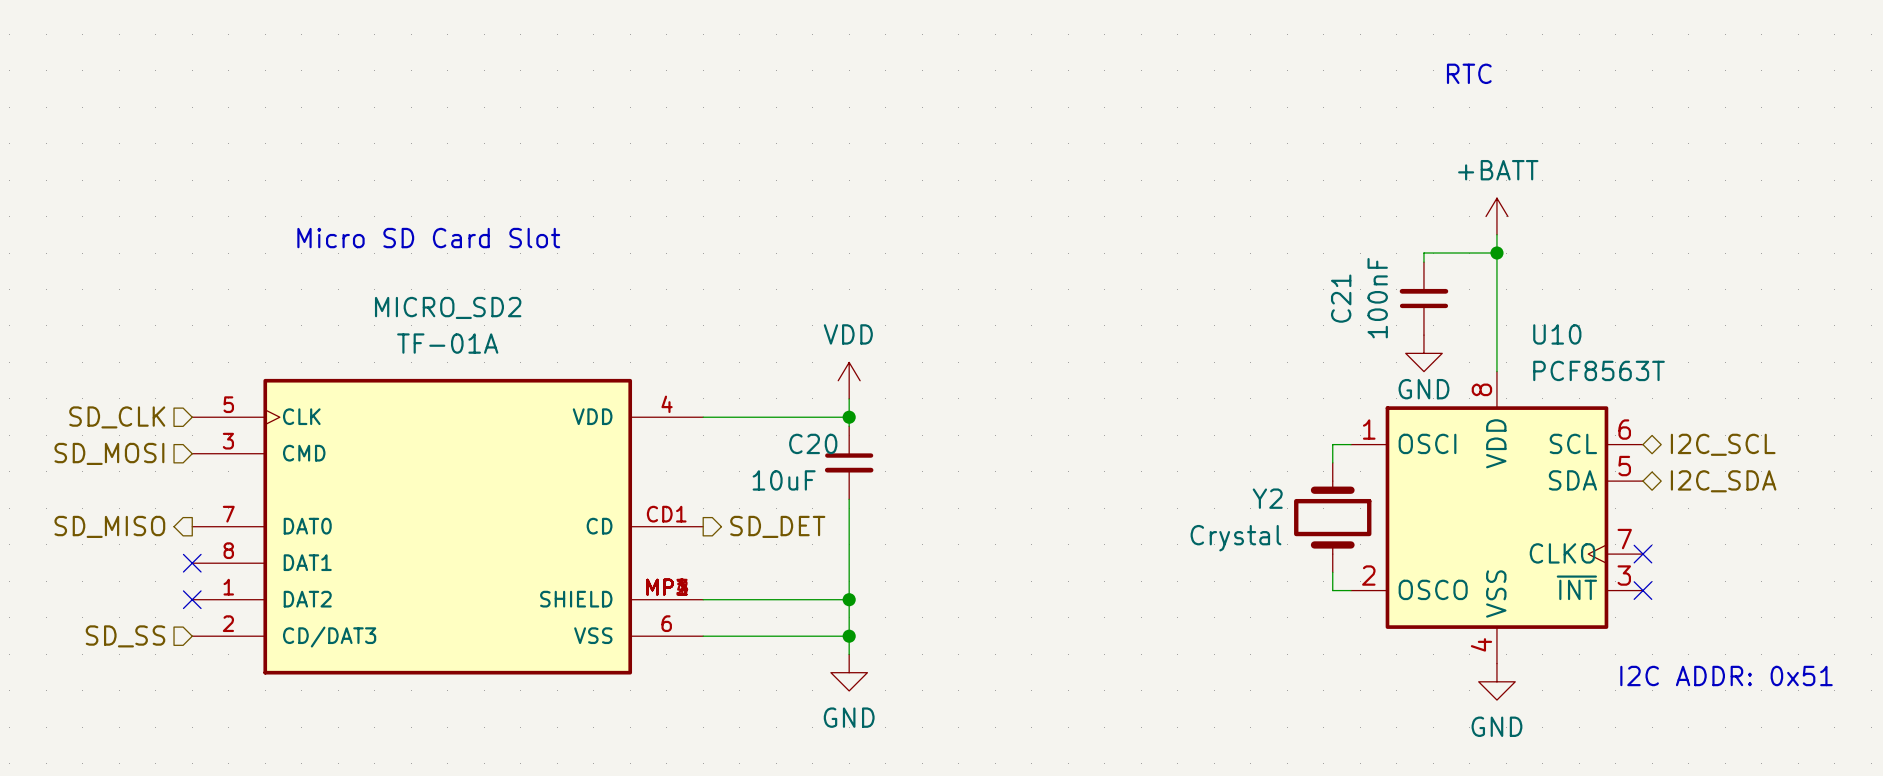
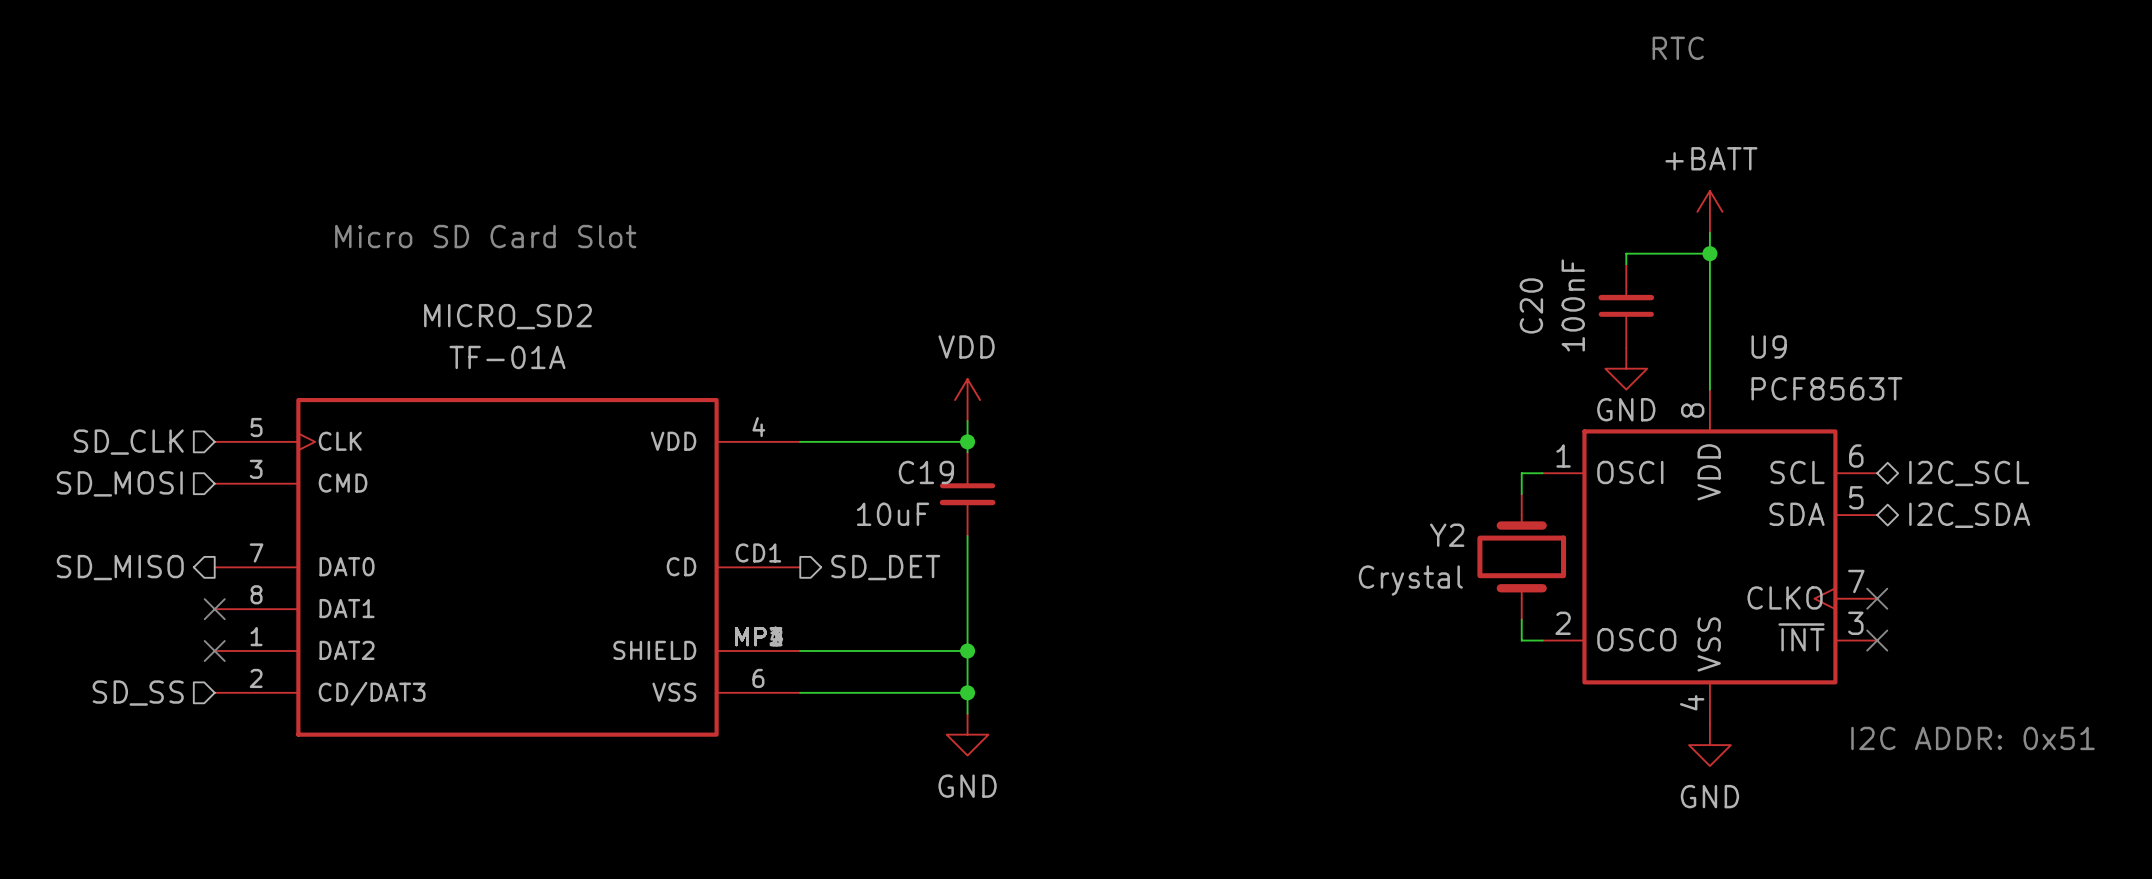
C21 name: C21 (1341, 298) -> C20 (1531, 305)
U10 name: U10 (1557, 334) -> U9 (1769, 346)
C20 name: C20 (813, 443) -> C19 (926, 472)

